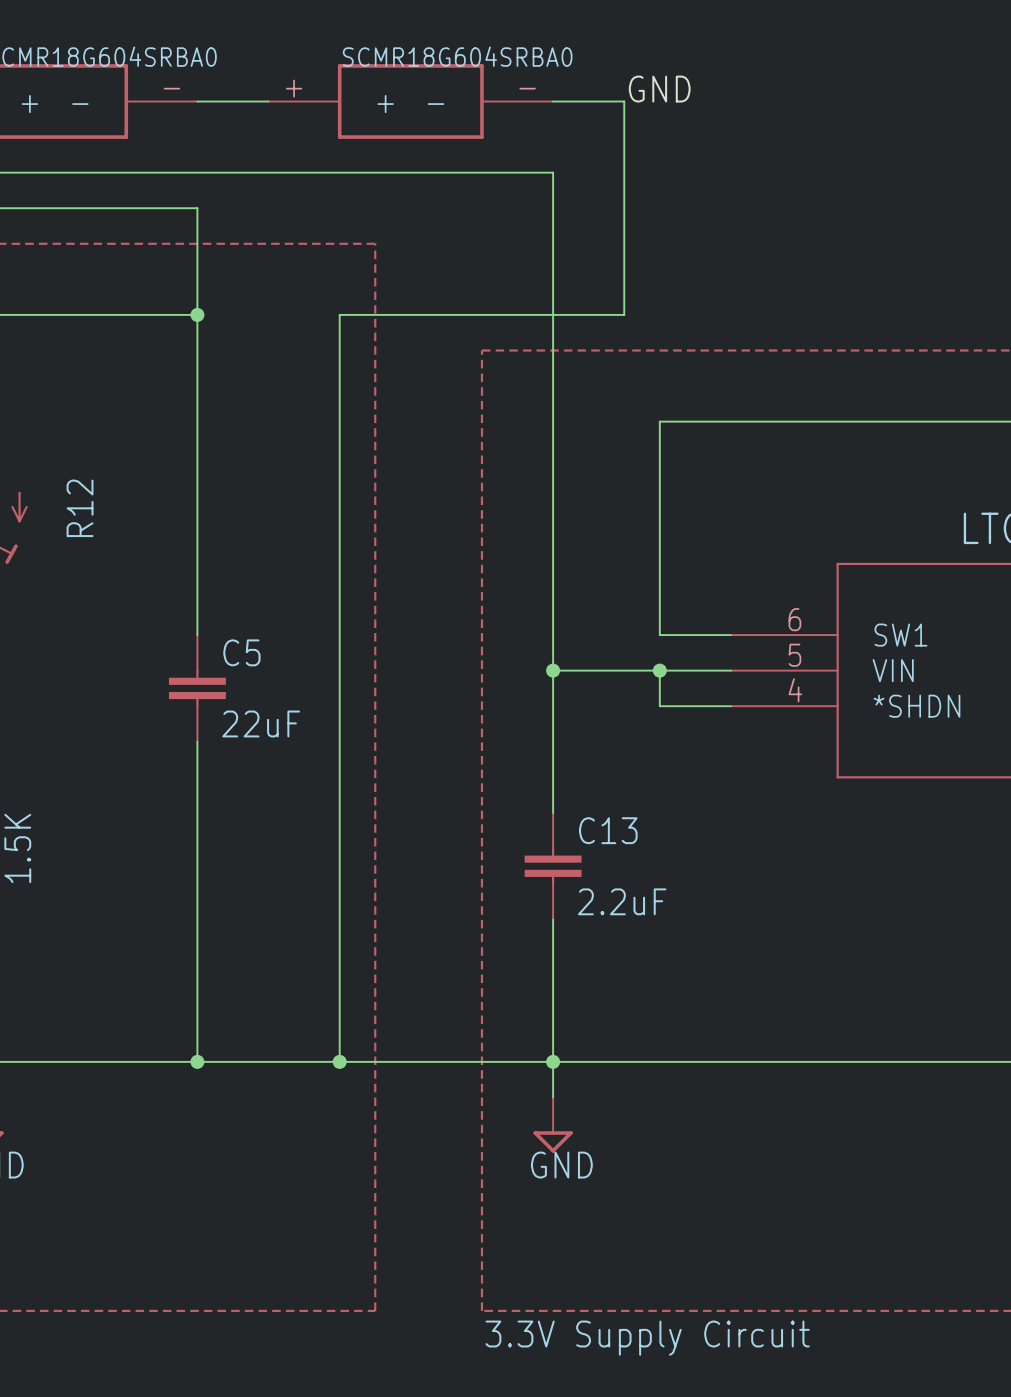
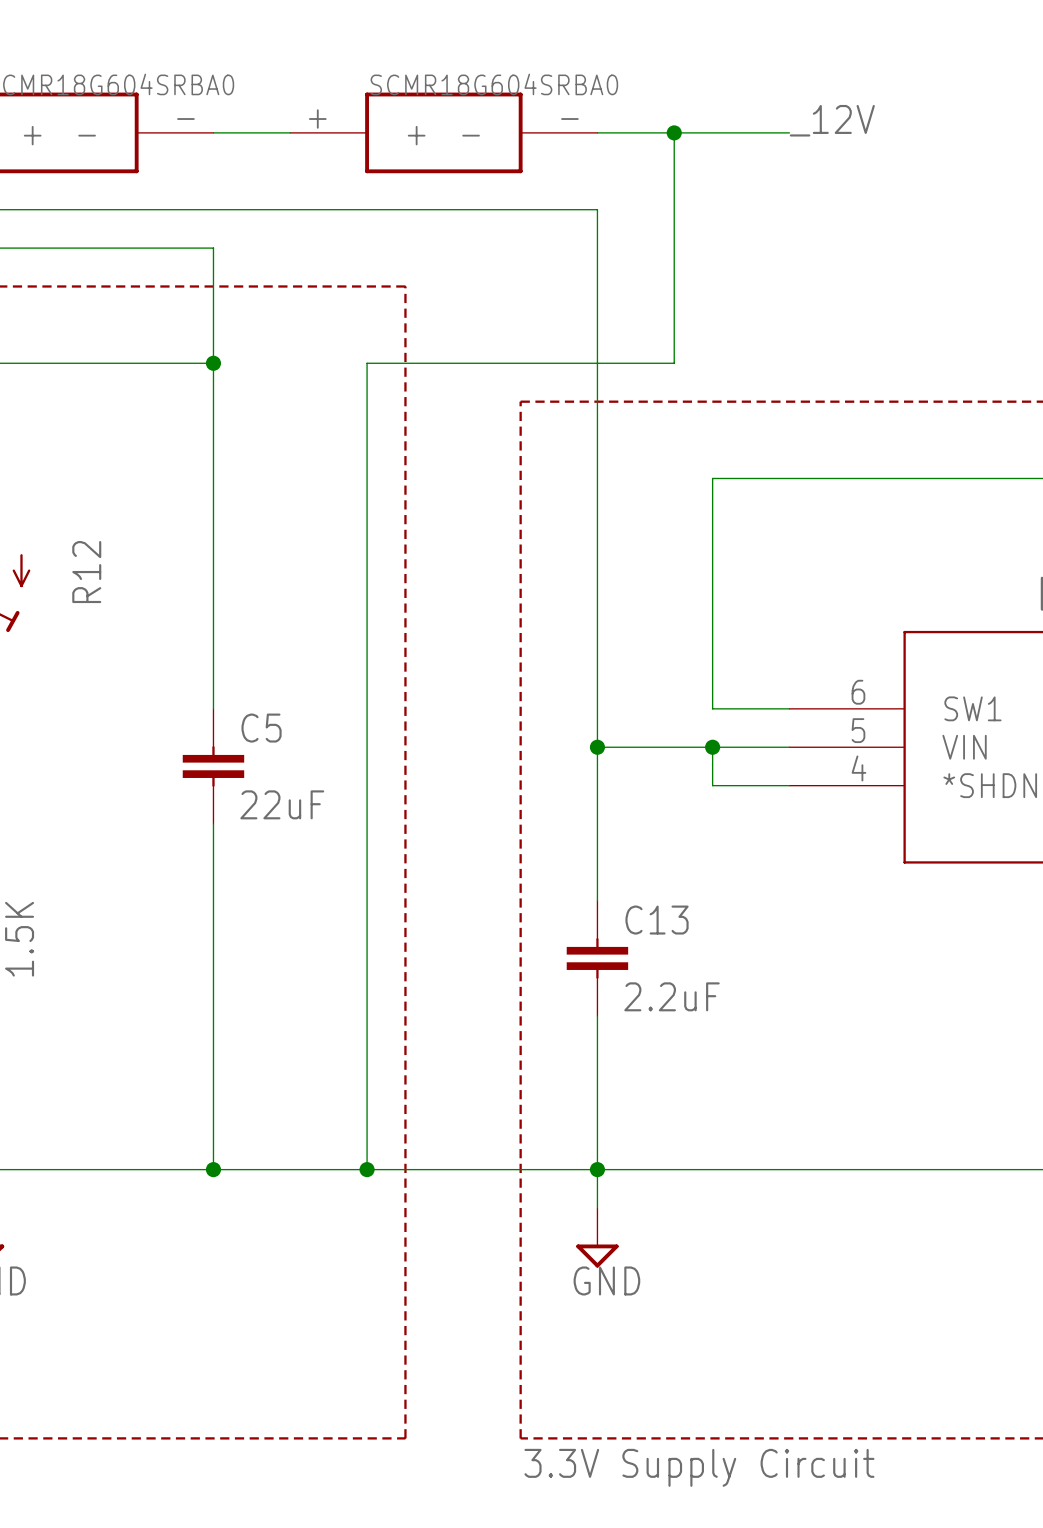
label: GND (659, 89) -> none
label: none -> _12V (832, 120)
wire: none -> (674, 132) (789, 132)
junction: none -> (674, 132)

